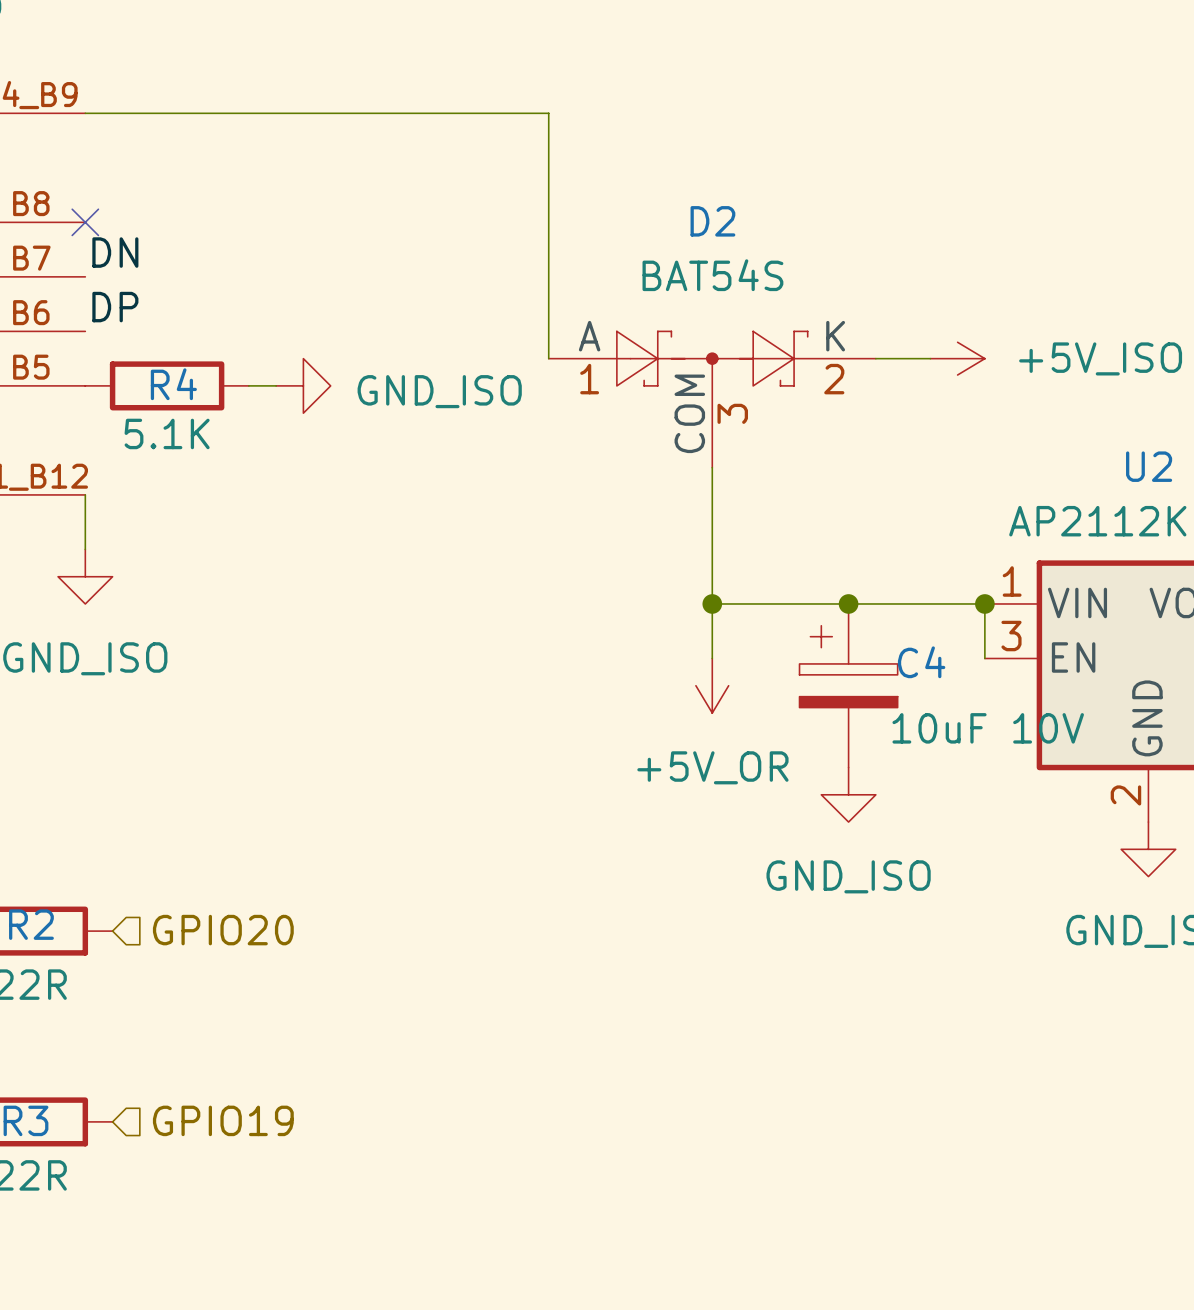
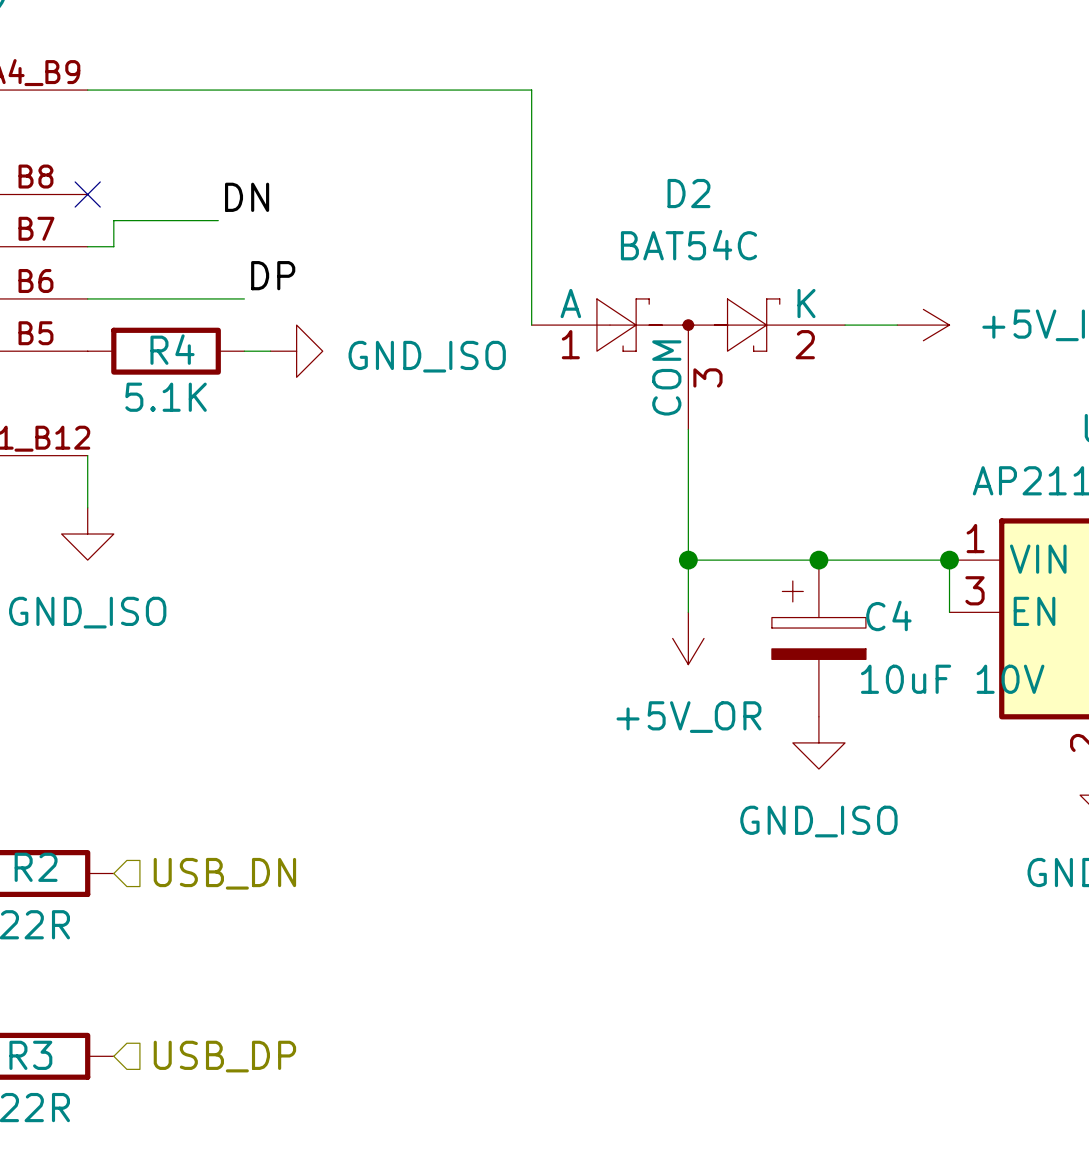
wire: none -> (218, 220) (113, 220) (113, 246) (87, 246)
label position: DN (115, 252) -> DN (247, 197)
D2 value: BAT54S (712, 275) -> BAT54C (688, 245)
label position: DP (115, 307) -> DP (273, 275)
wire: none -> (87, 298) (244, 298)
hierarchical label: GPIO20 (223, 930) -> USB_DN (224, 873)
hierarchical label: GPIO19 (223, 1120) -> USB_DP (224, 1056)

